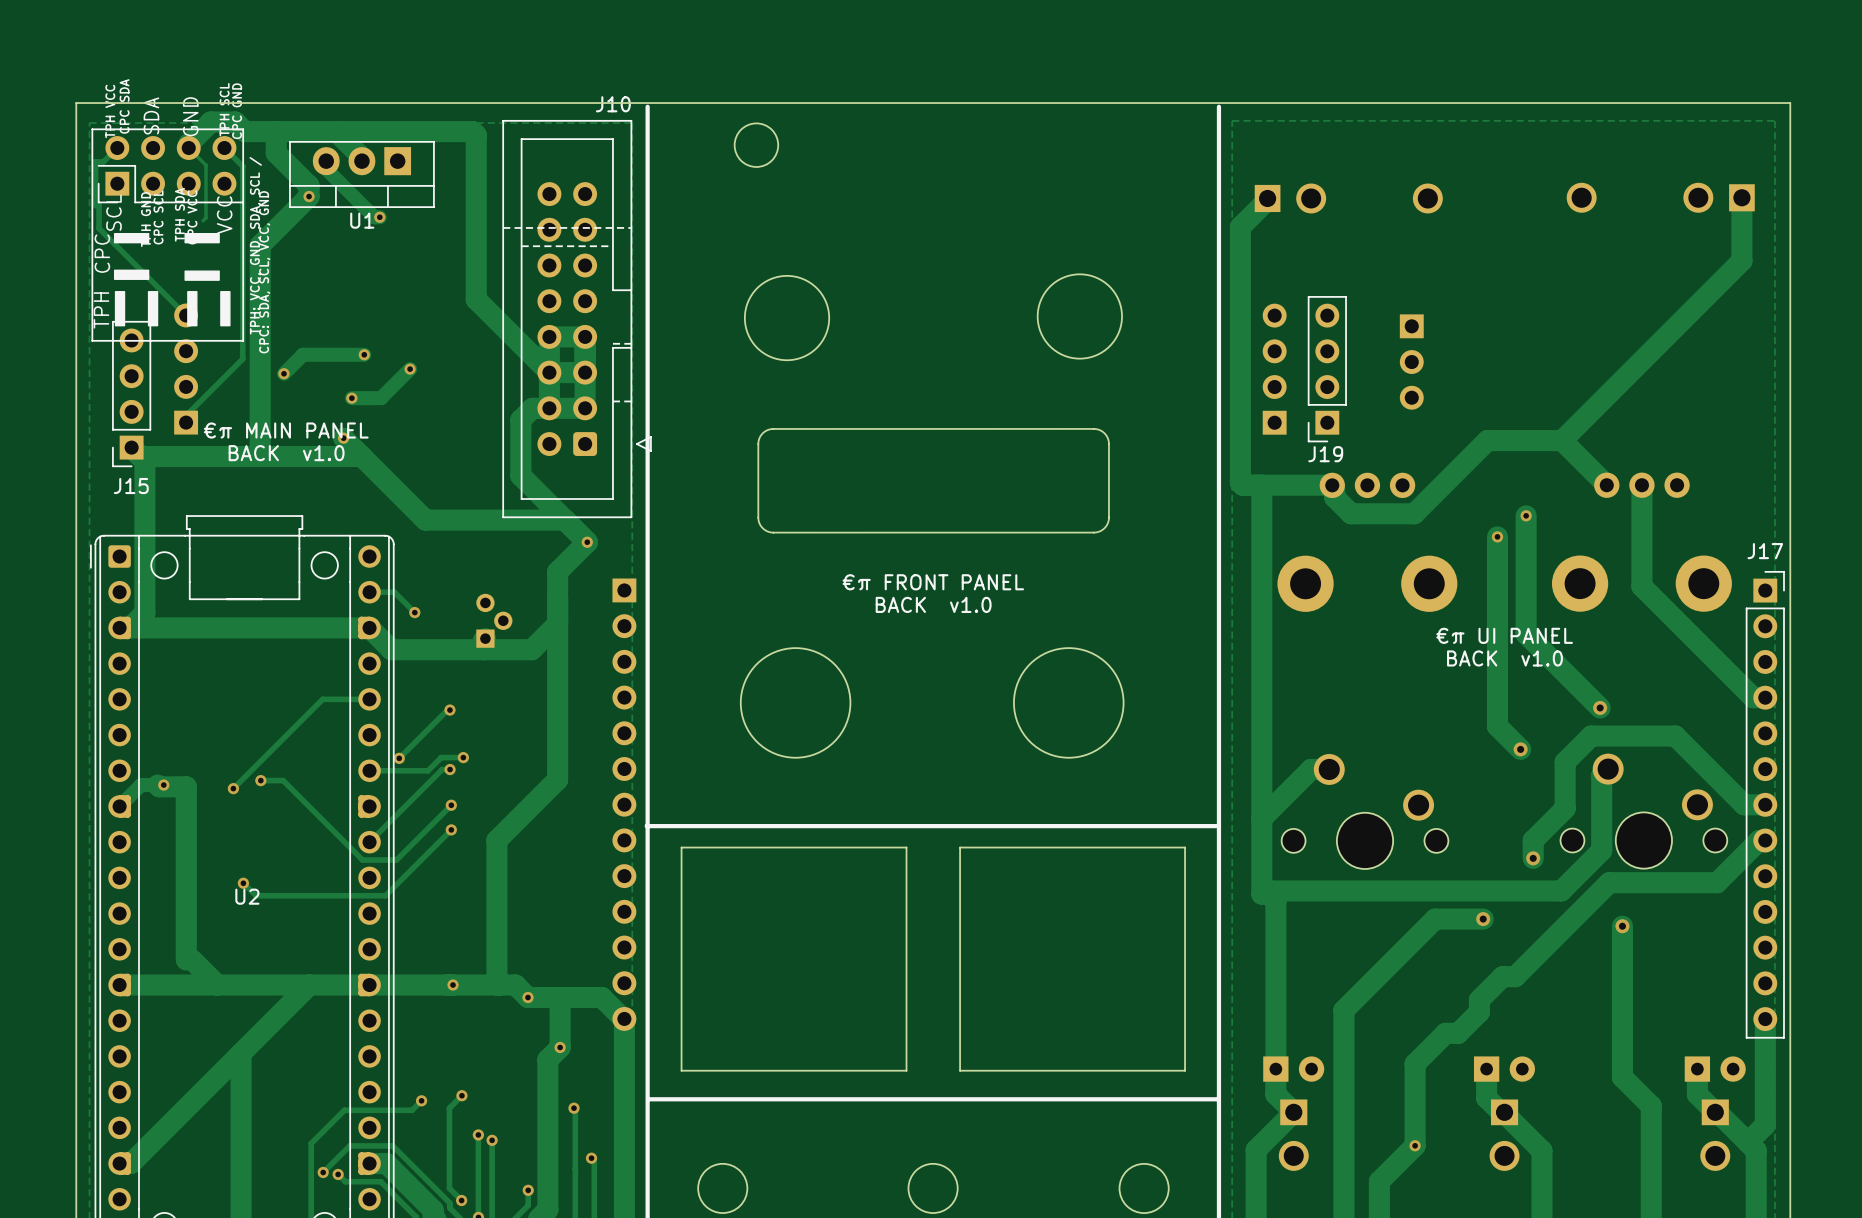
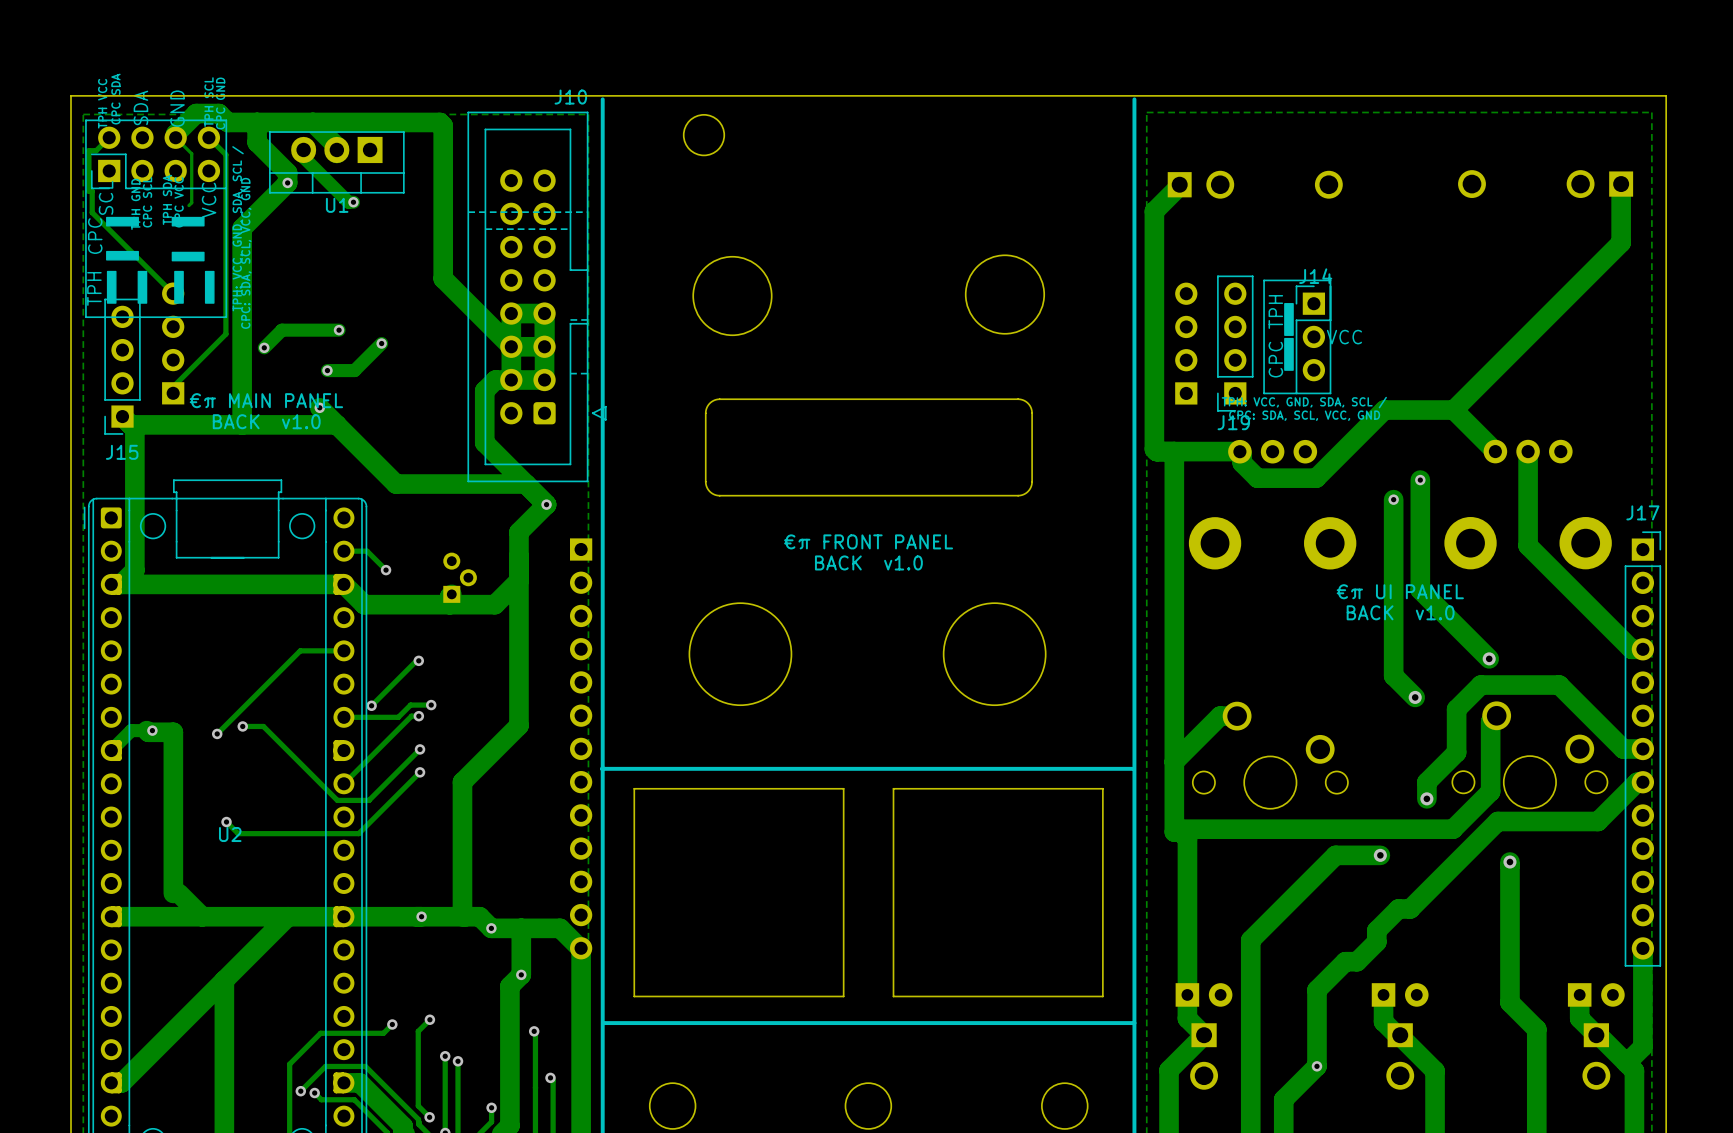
J14 side: top (1411, 362) -> bottom (1297, 336)

